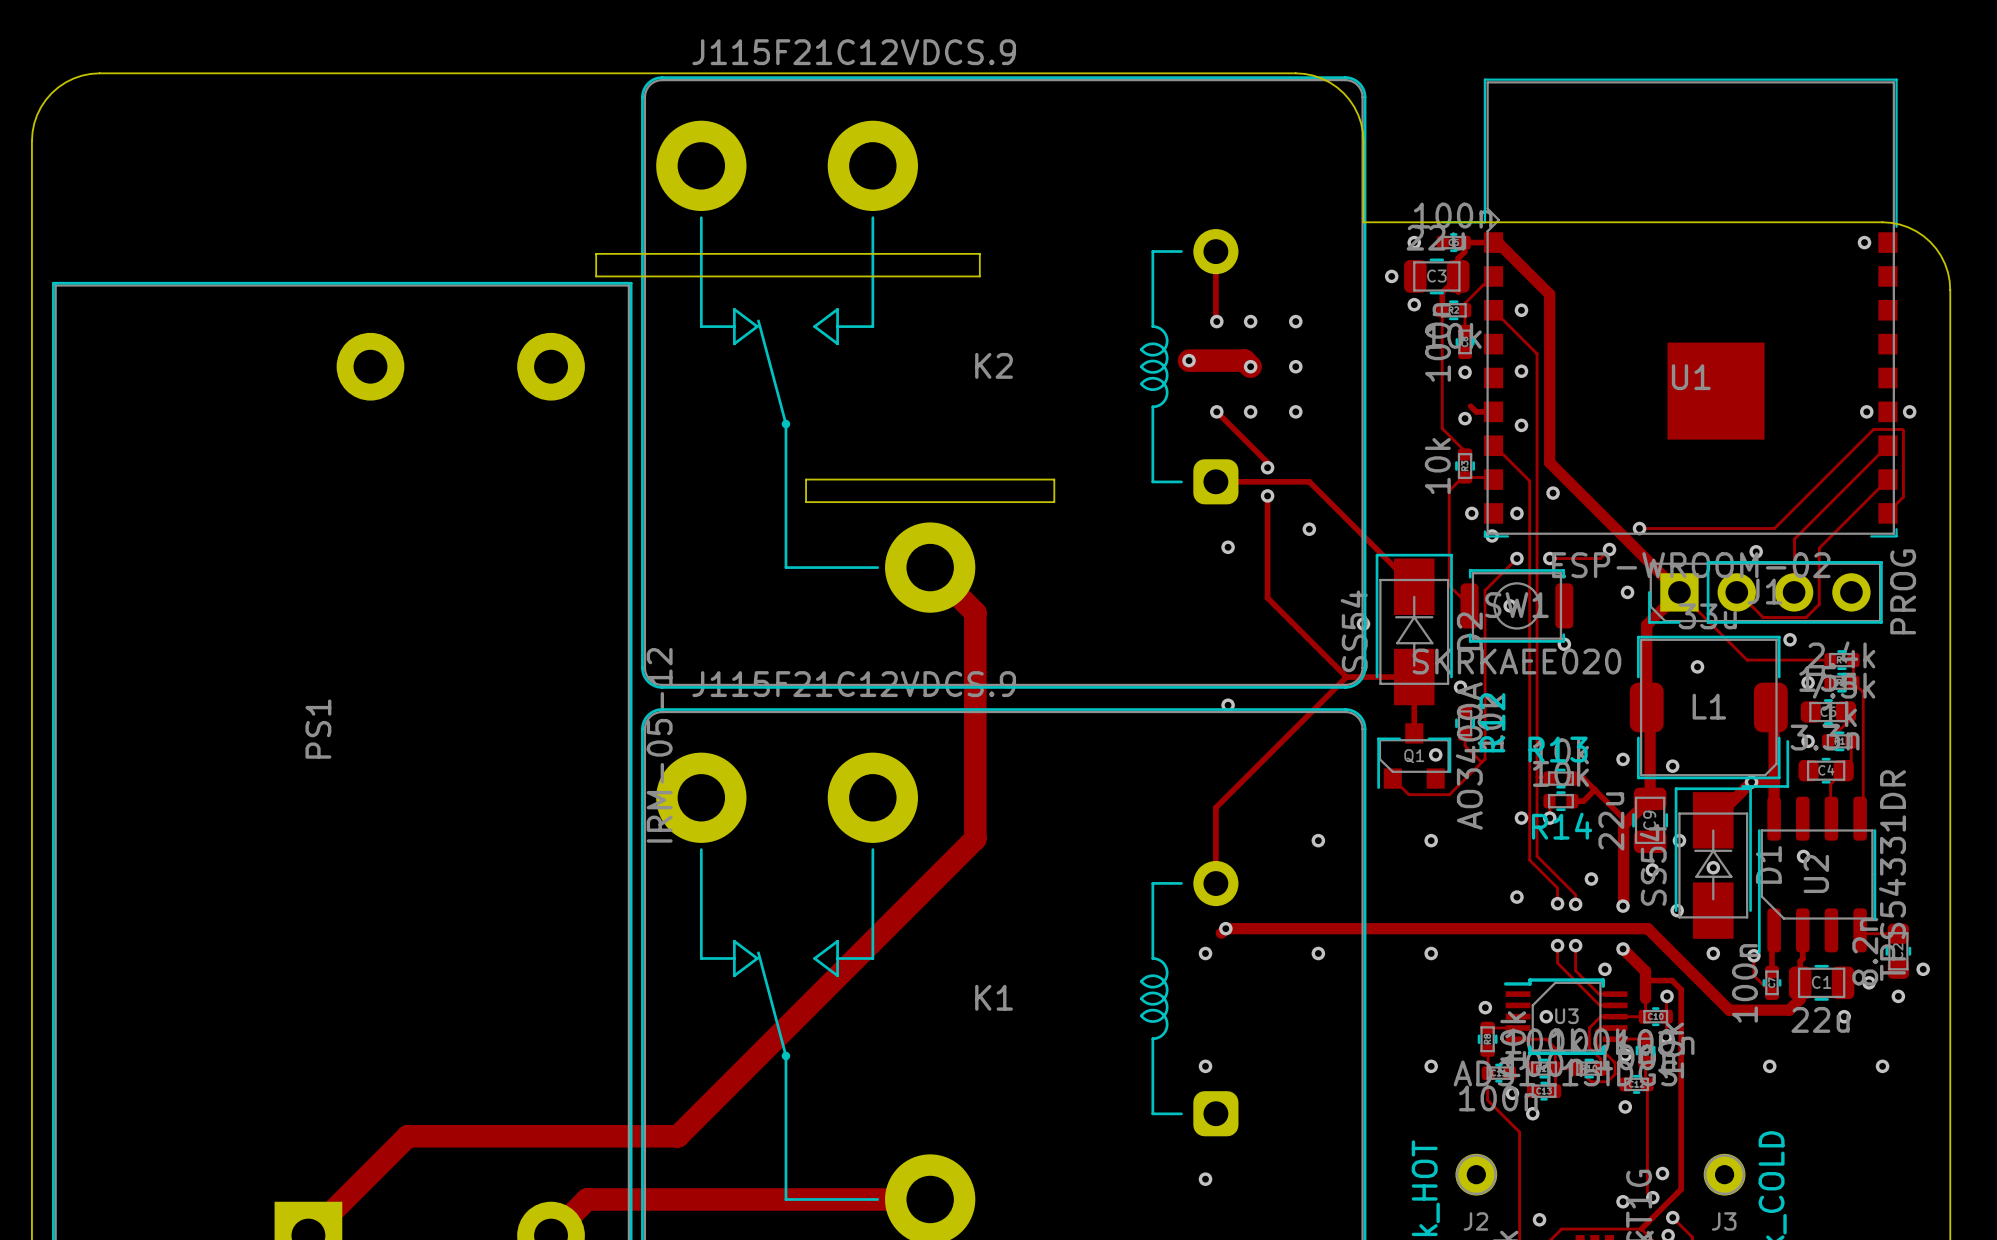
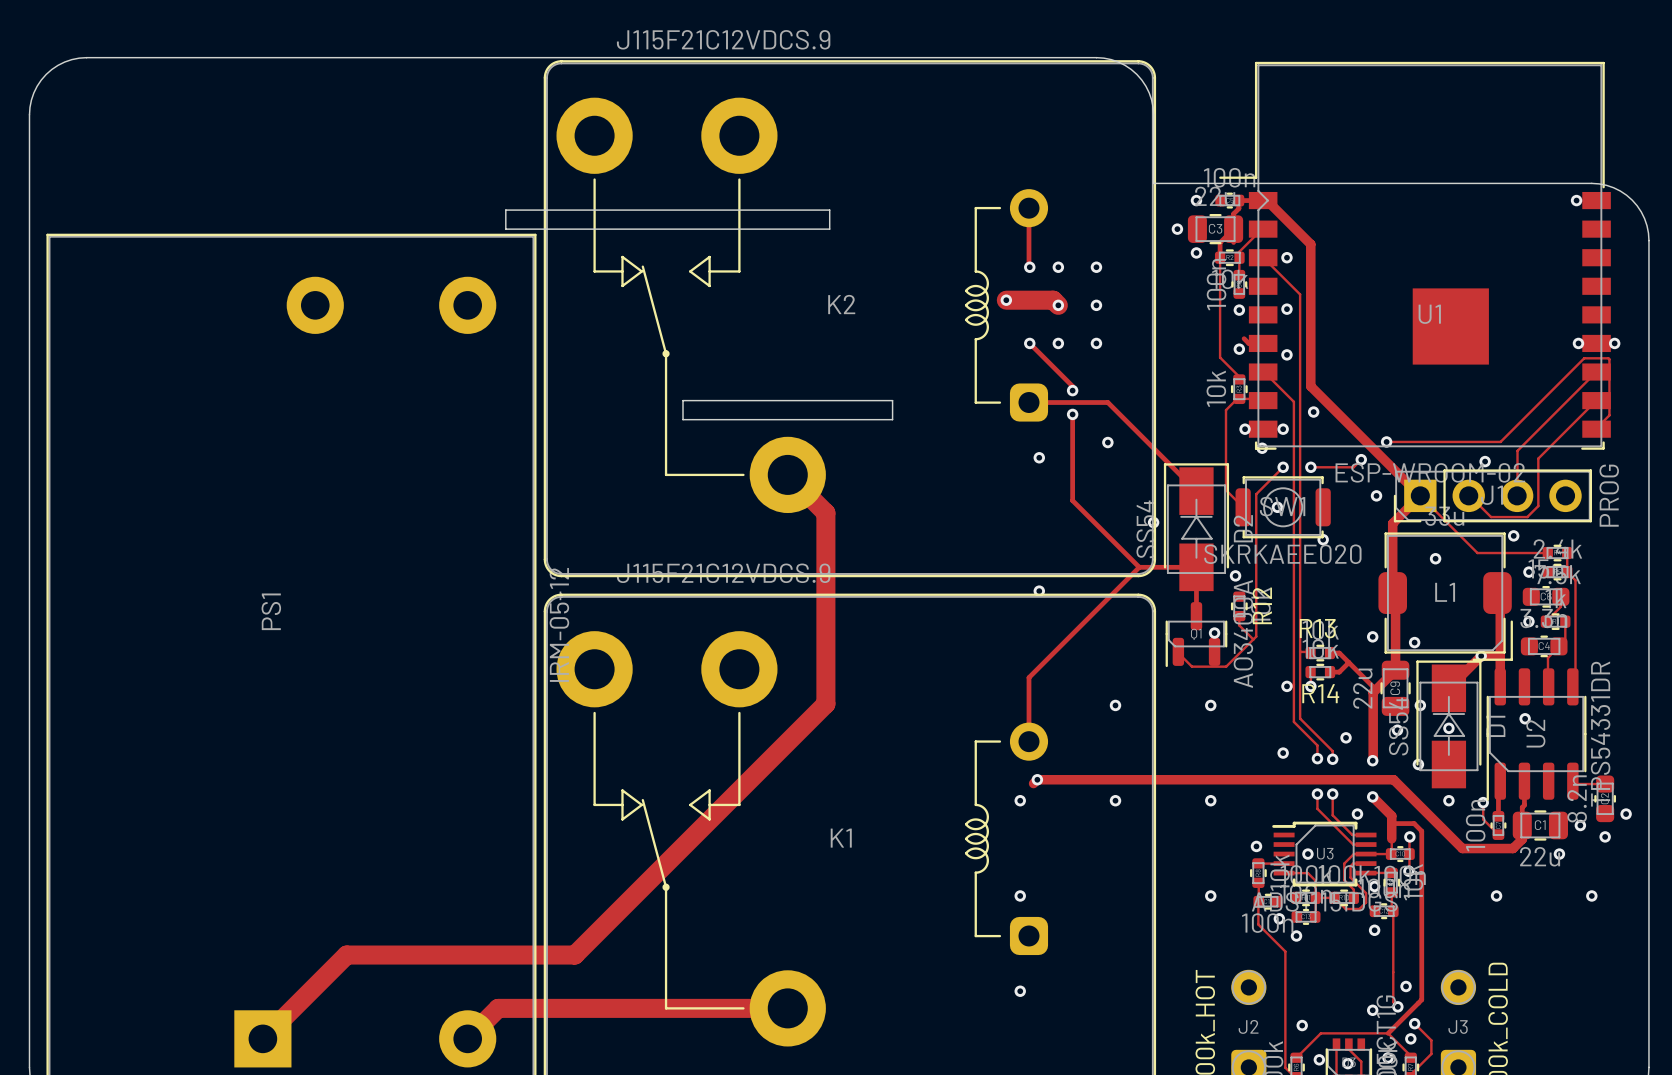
U1 footprint: [1441, 78, 1898, 538] -> [1219, 61, 1611, 450]
Q1 footprint: [1377, 723, 1452, 789] -> [1165, 602, 1228, 668]

